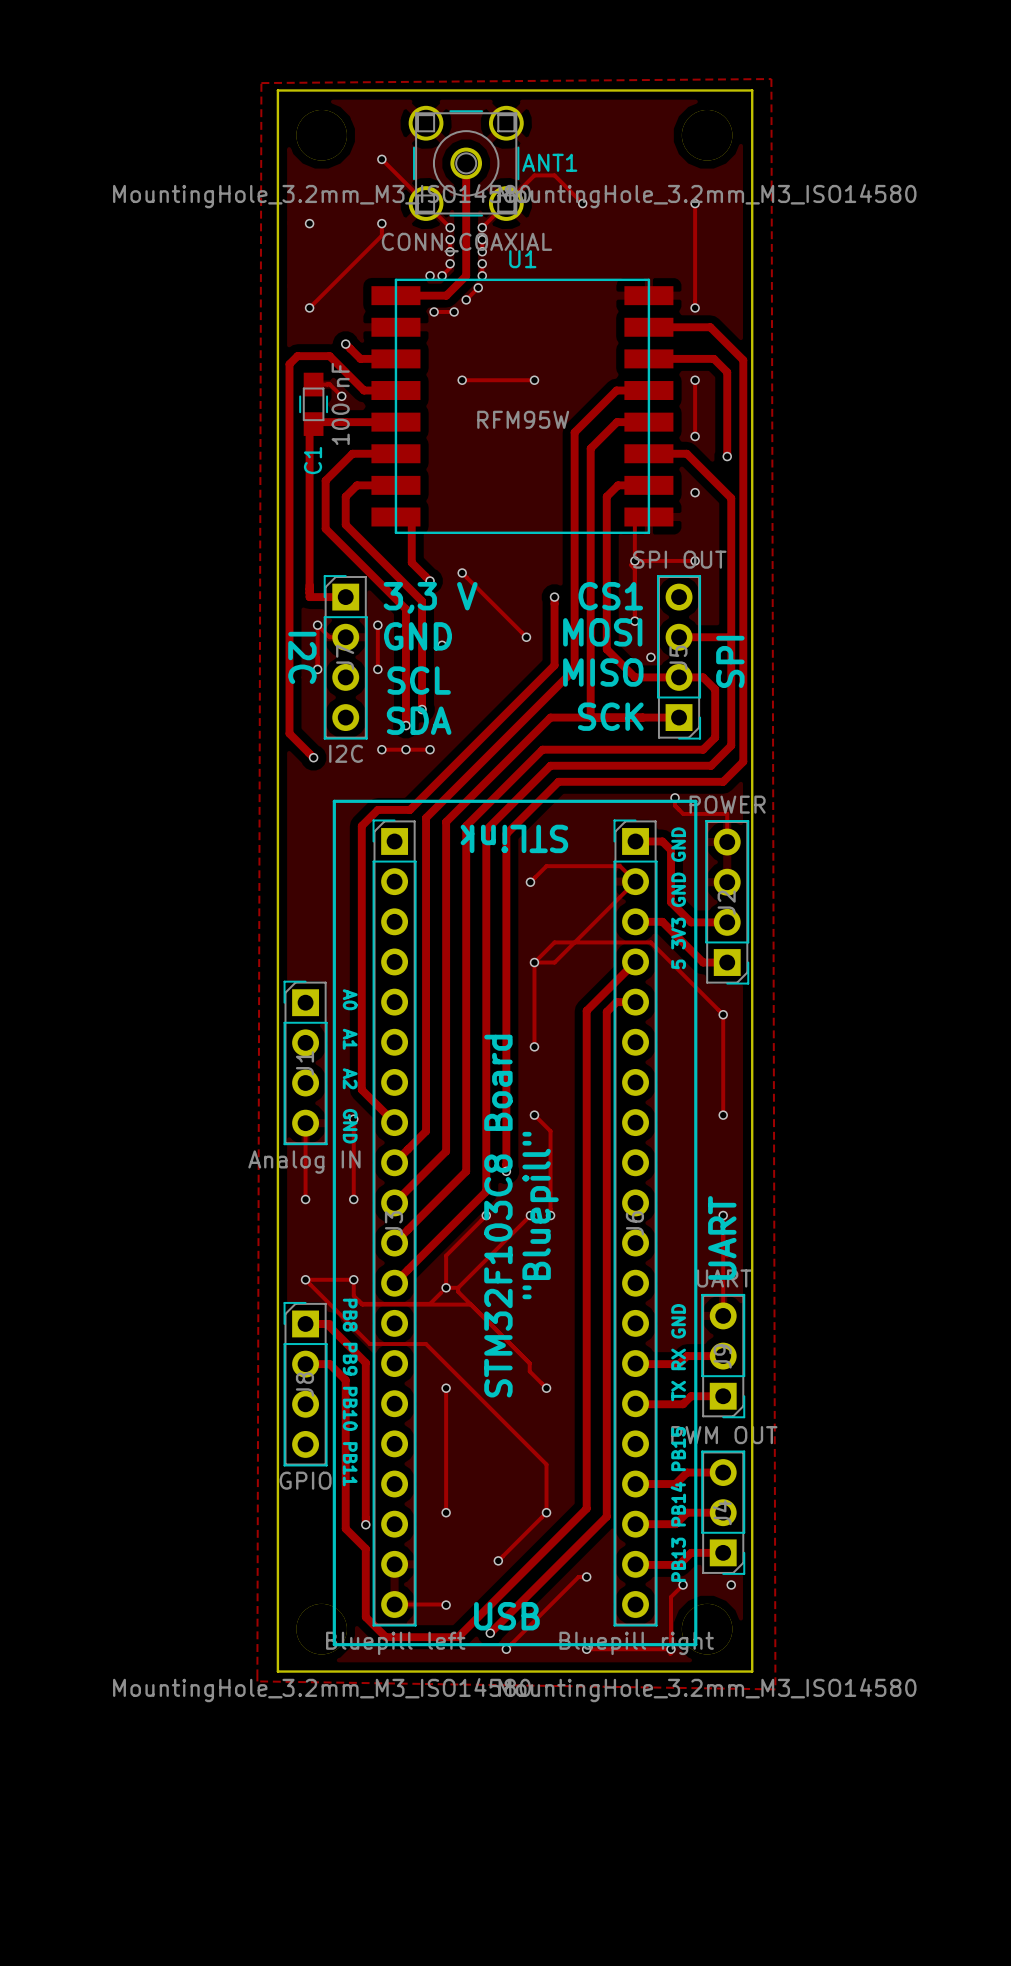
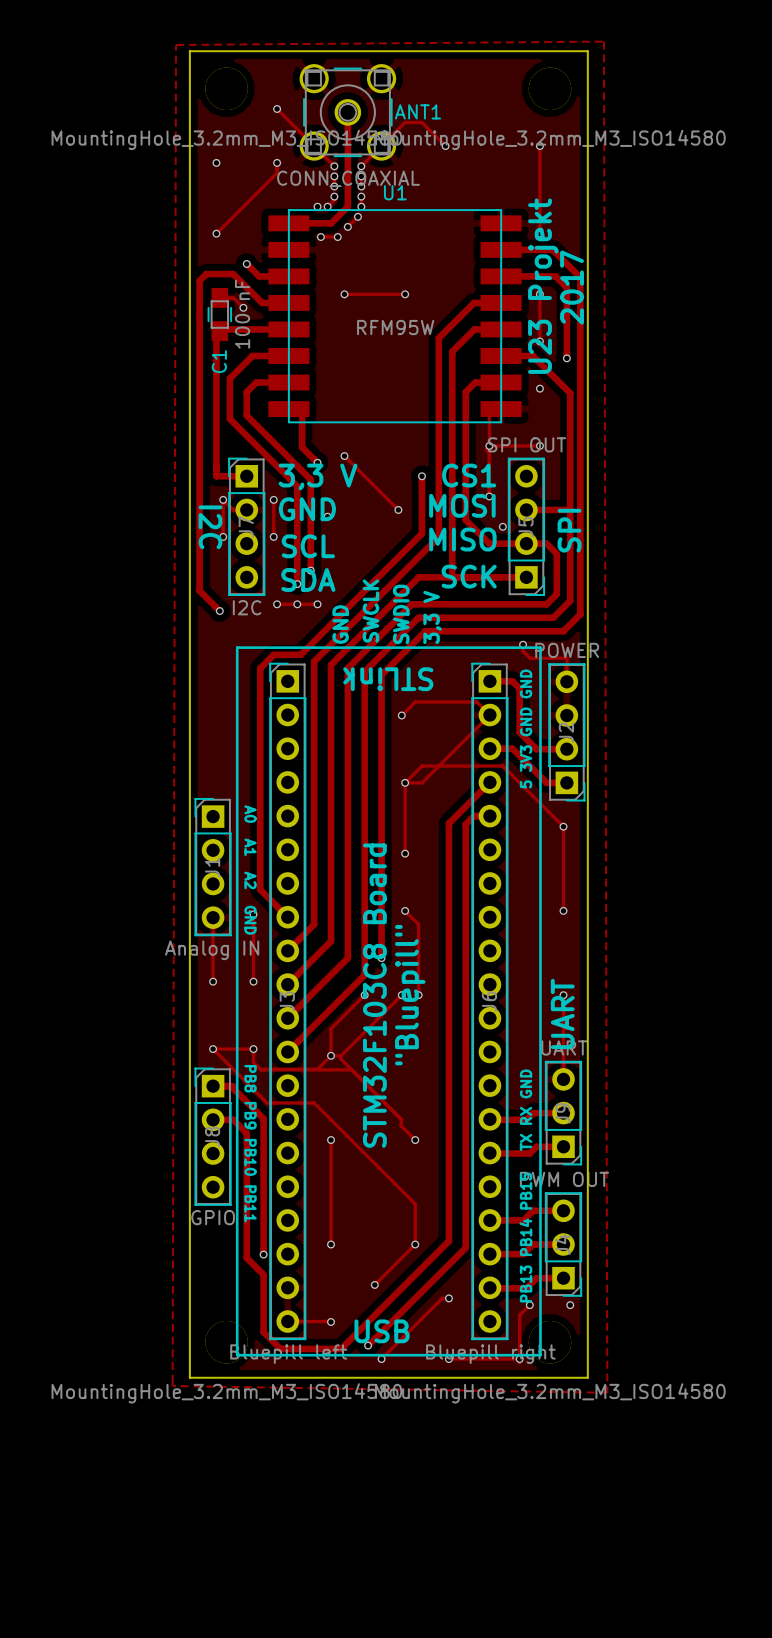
text: none -> U23 Projekt (543, 286)
text: none -> 2017 (572, 287)
text: none -> SWCLK (370, 611)
text: none -> SWDIO (401, 614)
text: none -> 3,3 V (432, 617)
text: none -> GND (340, 624)

